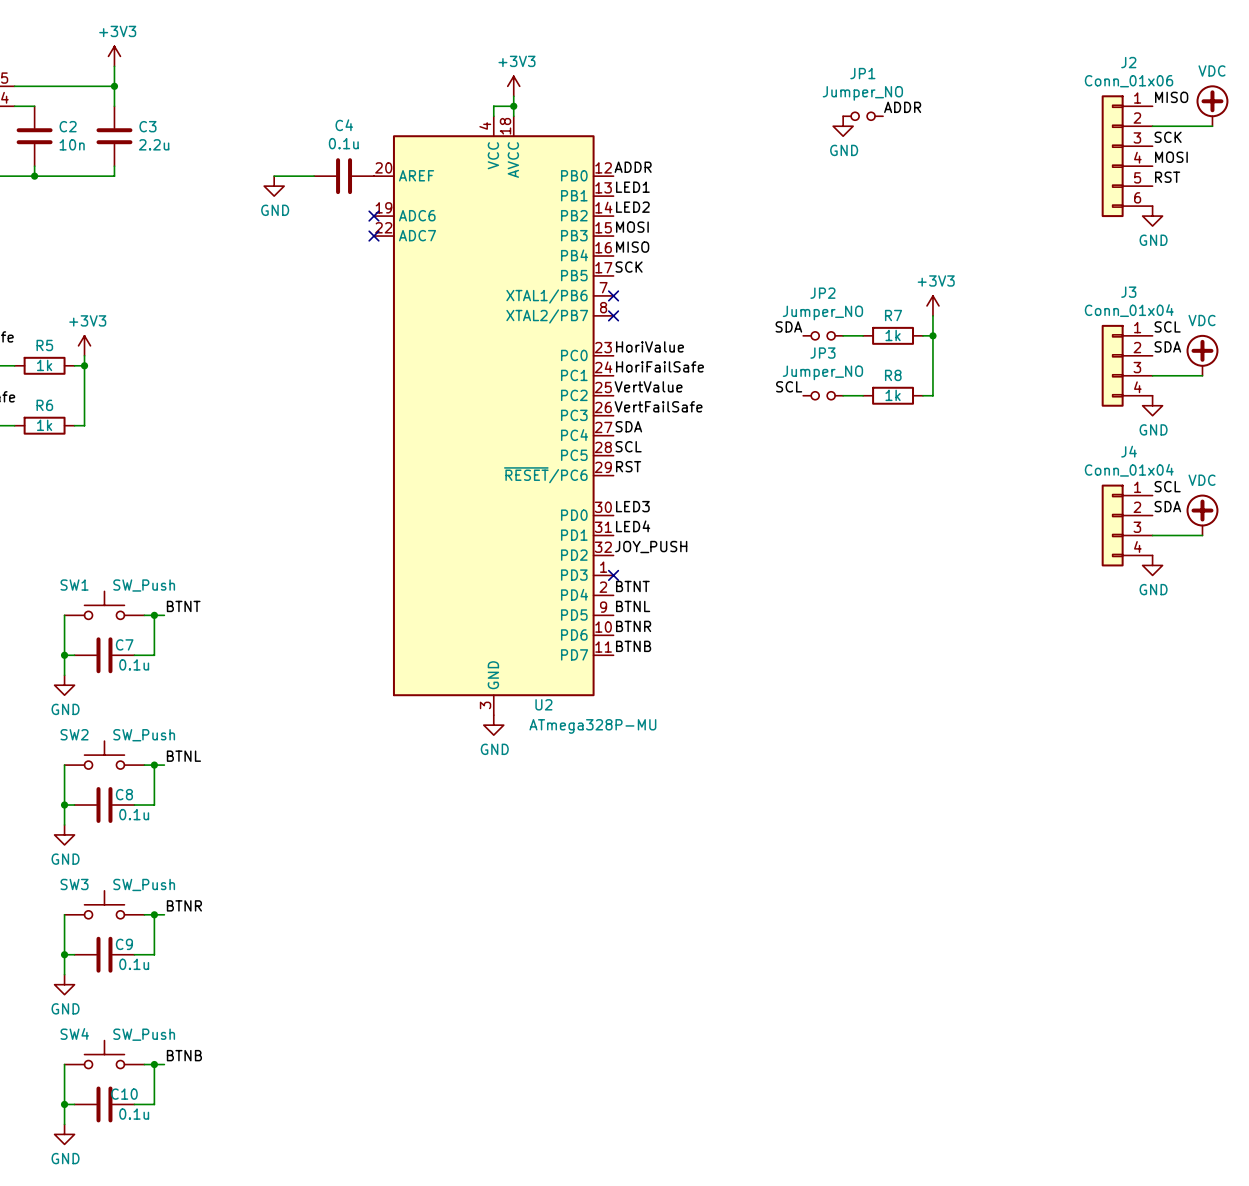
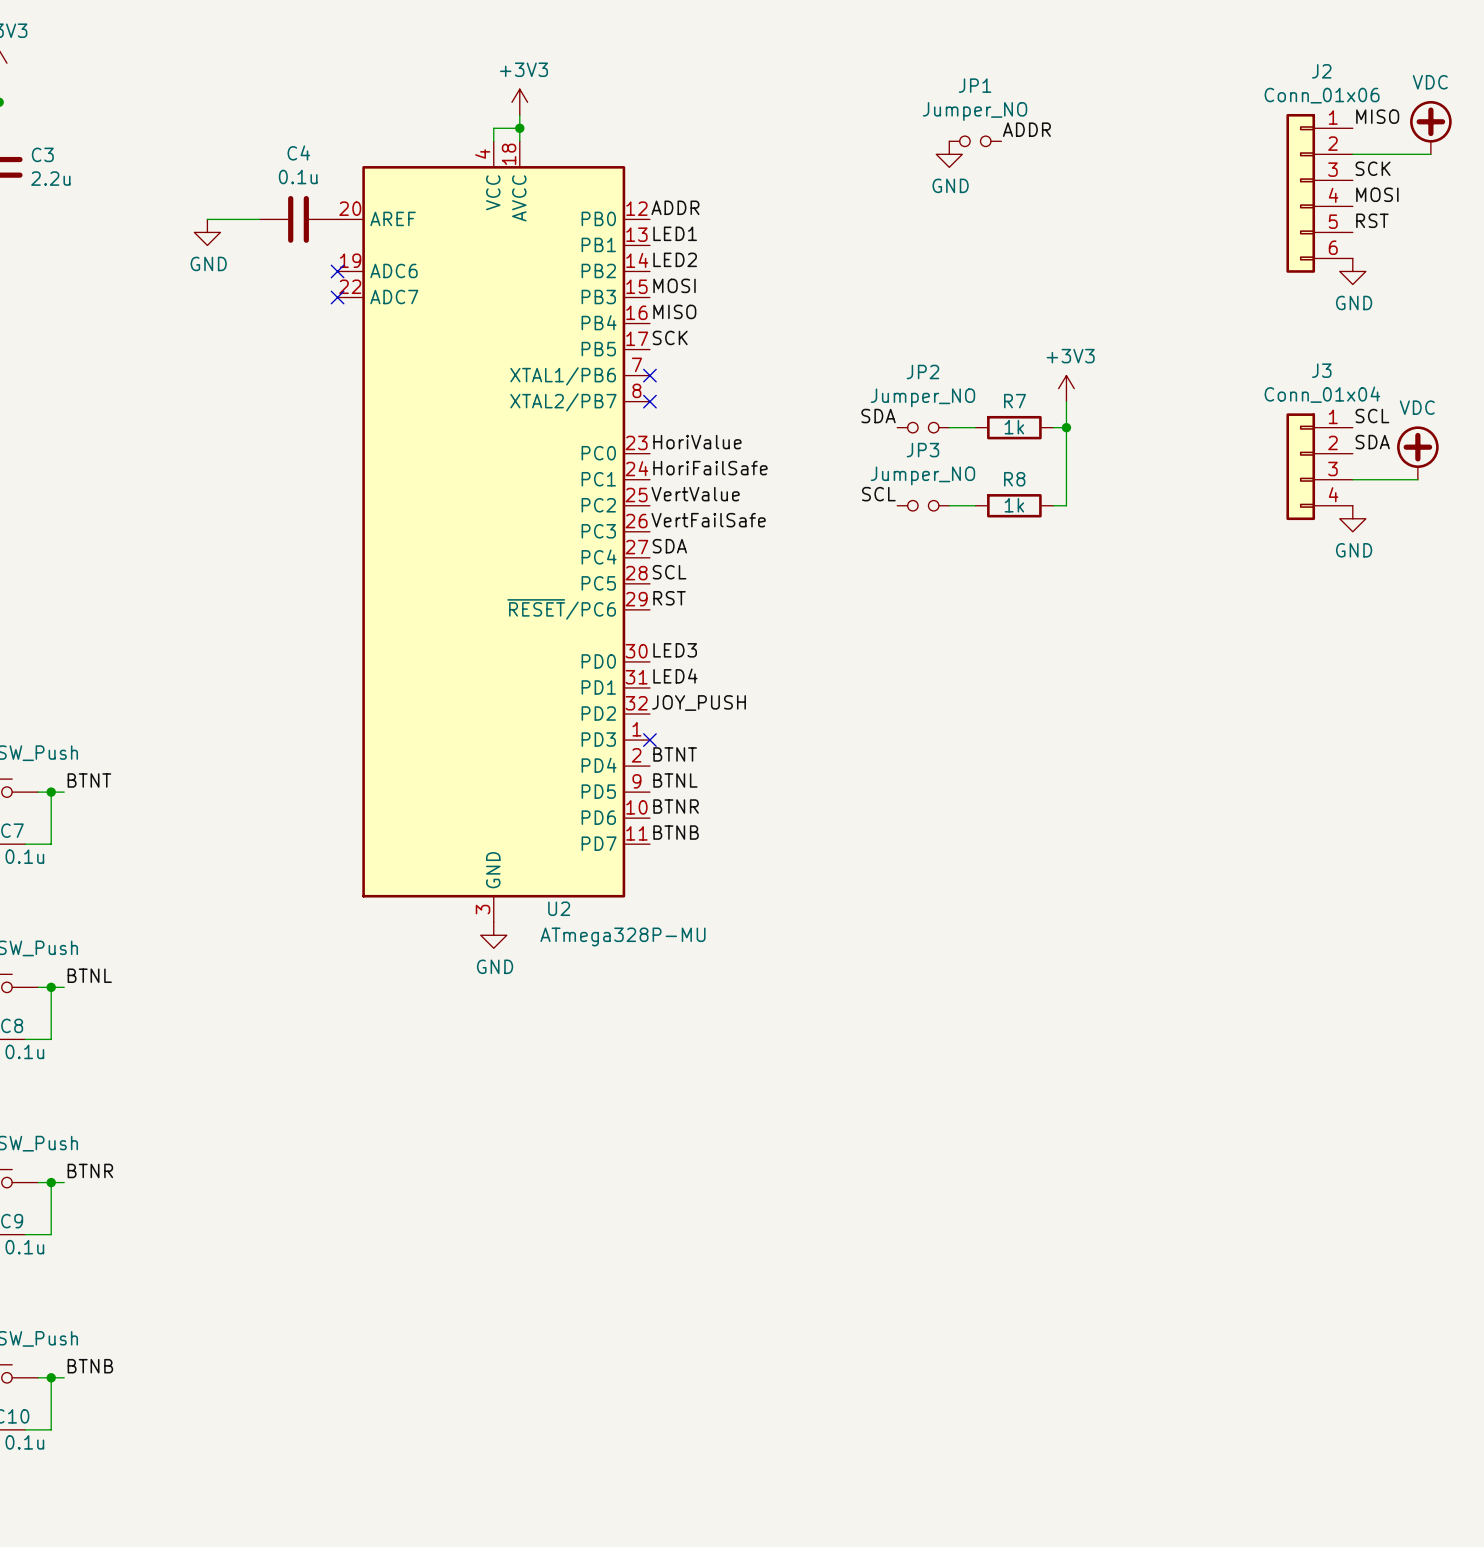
label: SCL (1167, 486) -> none
label: SDA (1167, 506) -> none
power symbol: VDC (1202, 515) -> none
J4: Conn_01x04 (1127, 525) -> none
wire: (1152, 535) (1202, 535) -> none
power symbol: GND (1152, 565) -> none

